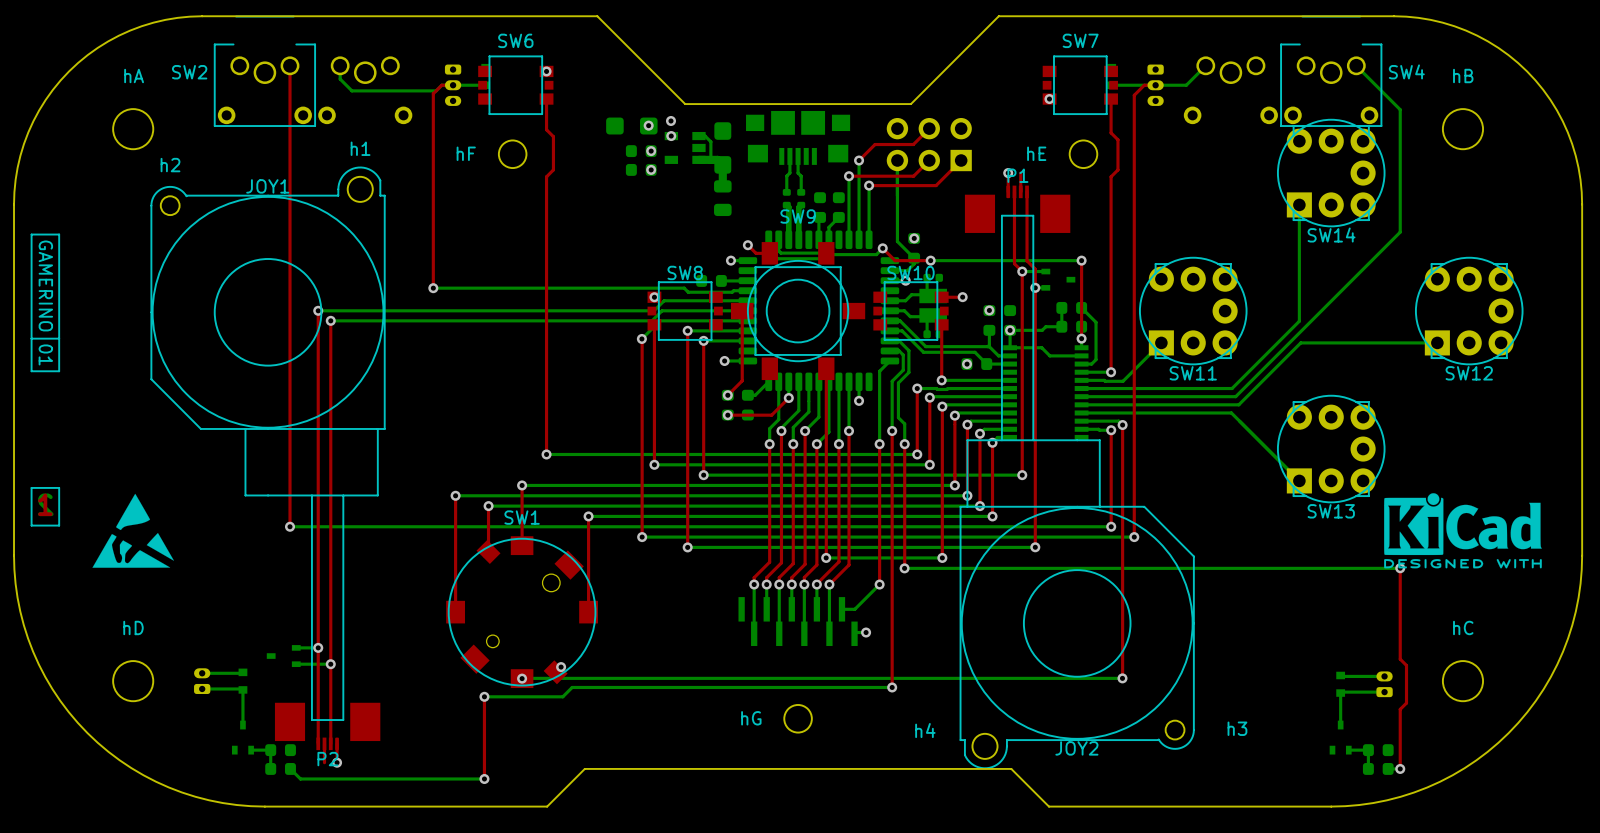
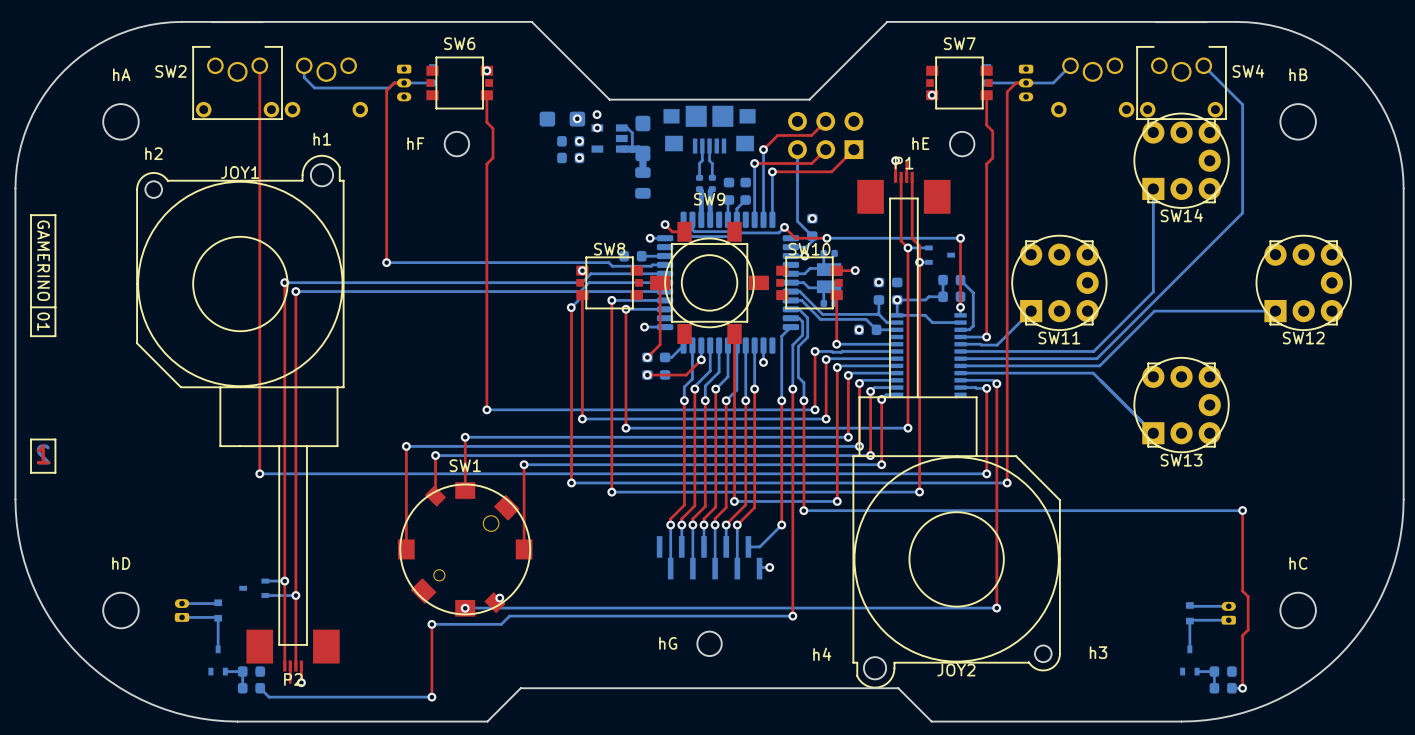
drawing: [92, 493, 174, 568] -> none
drawing: [1384, 493, 1542, 569] -> none

